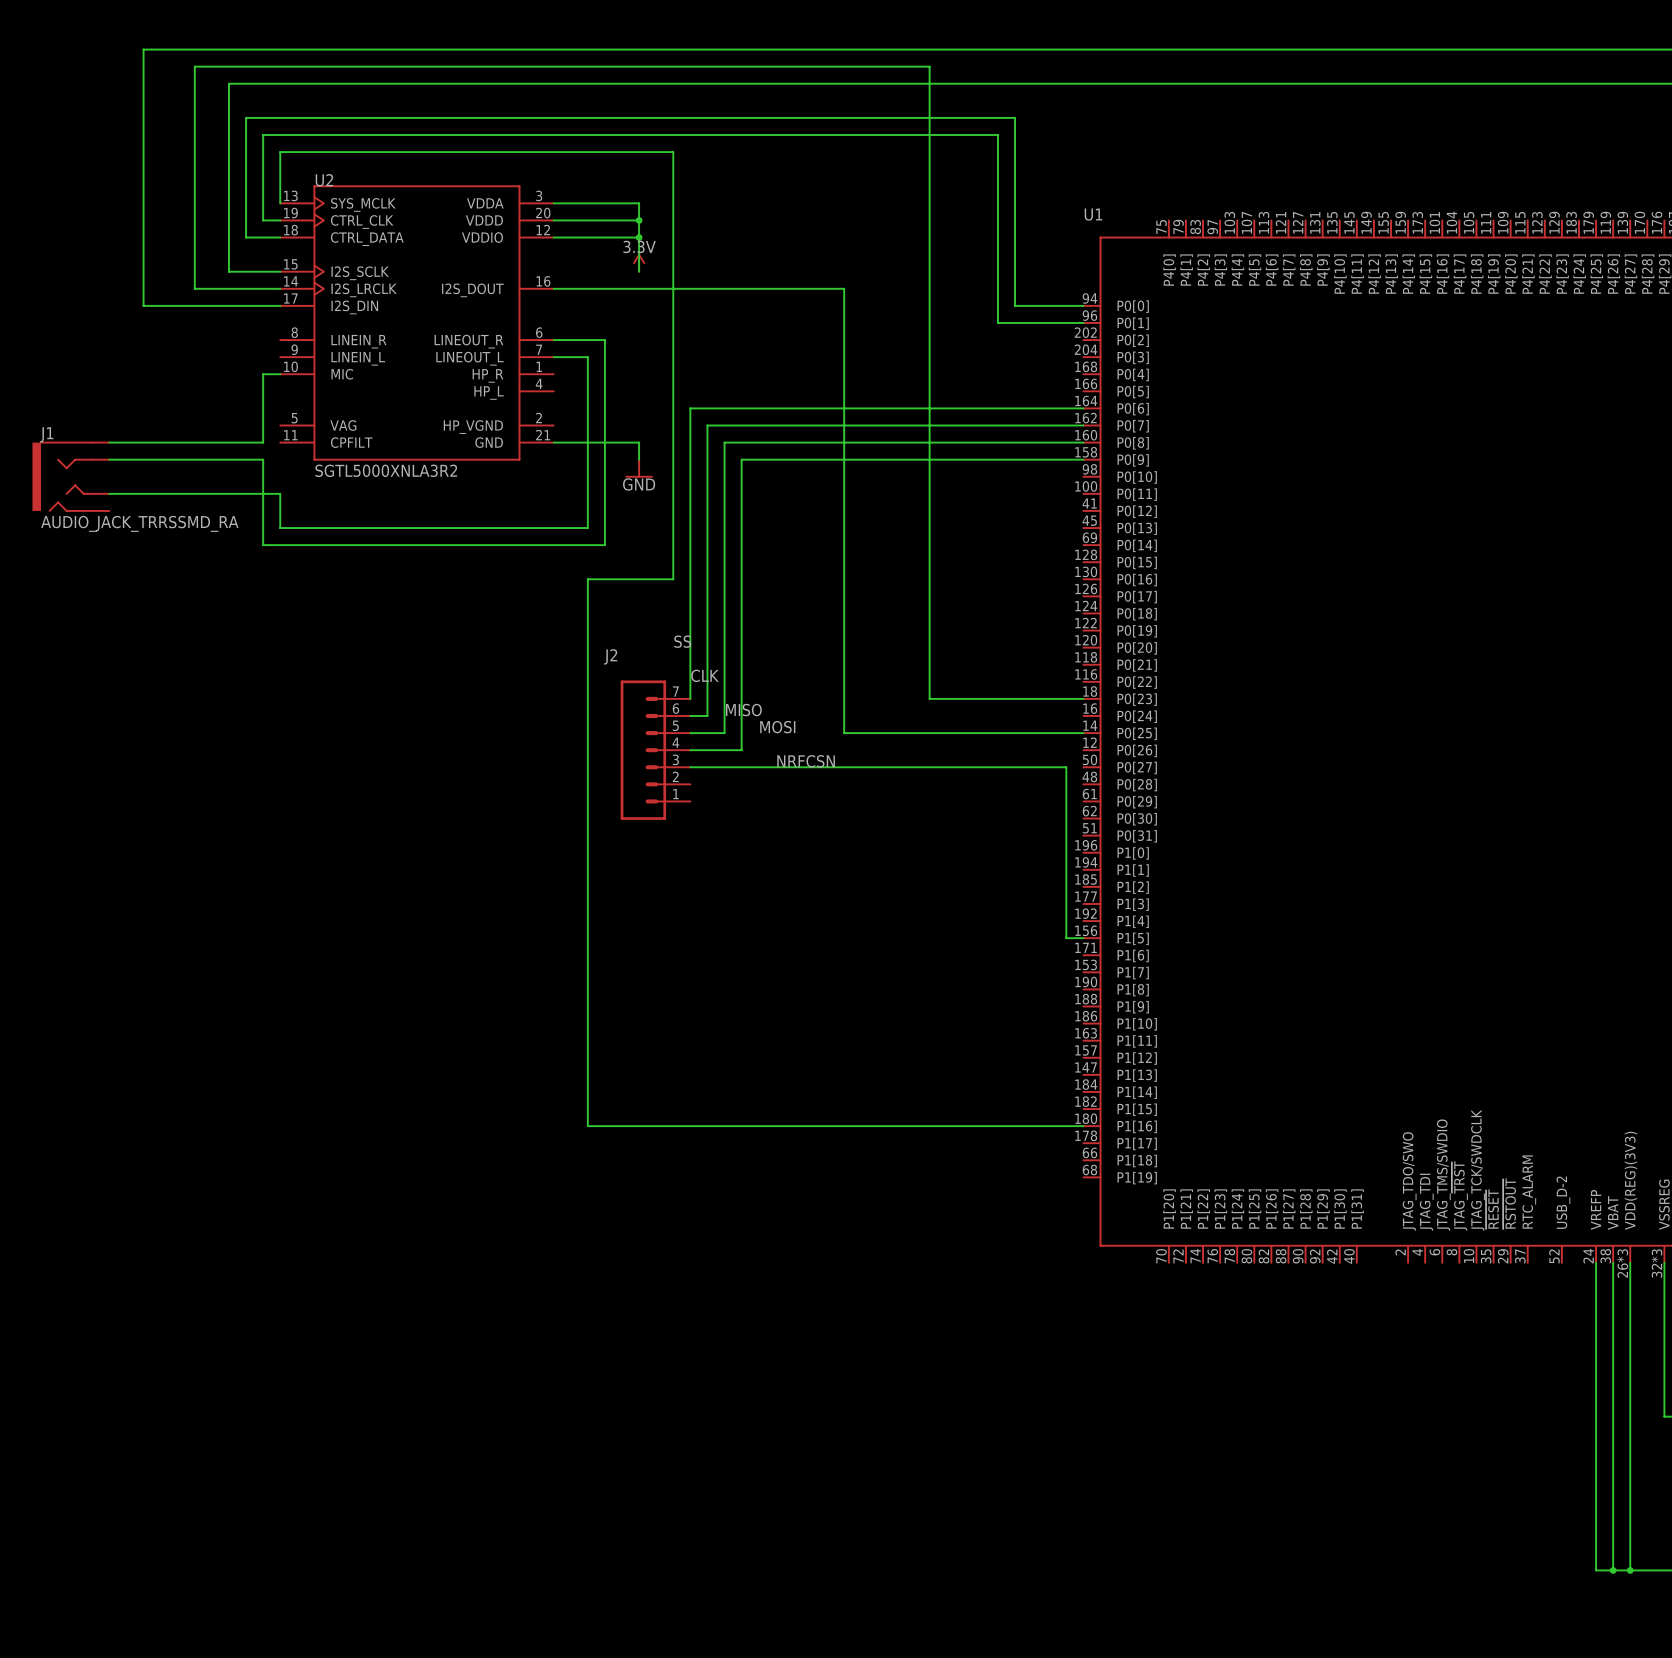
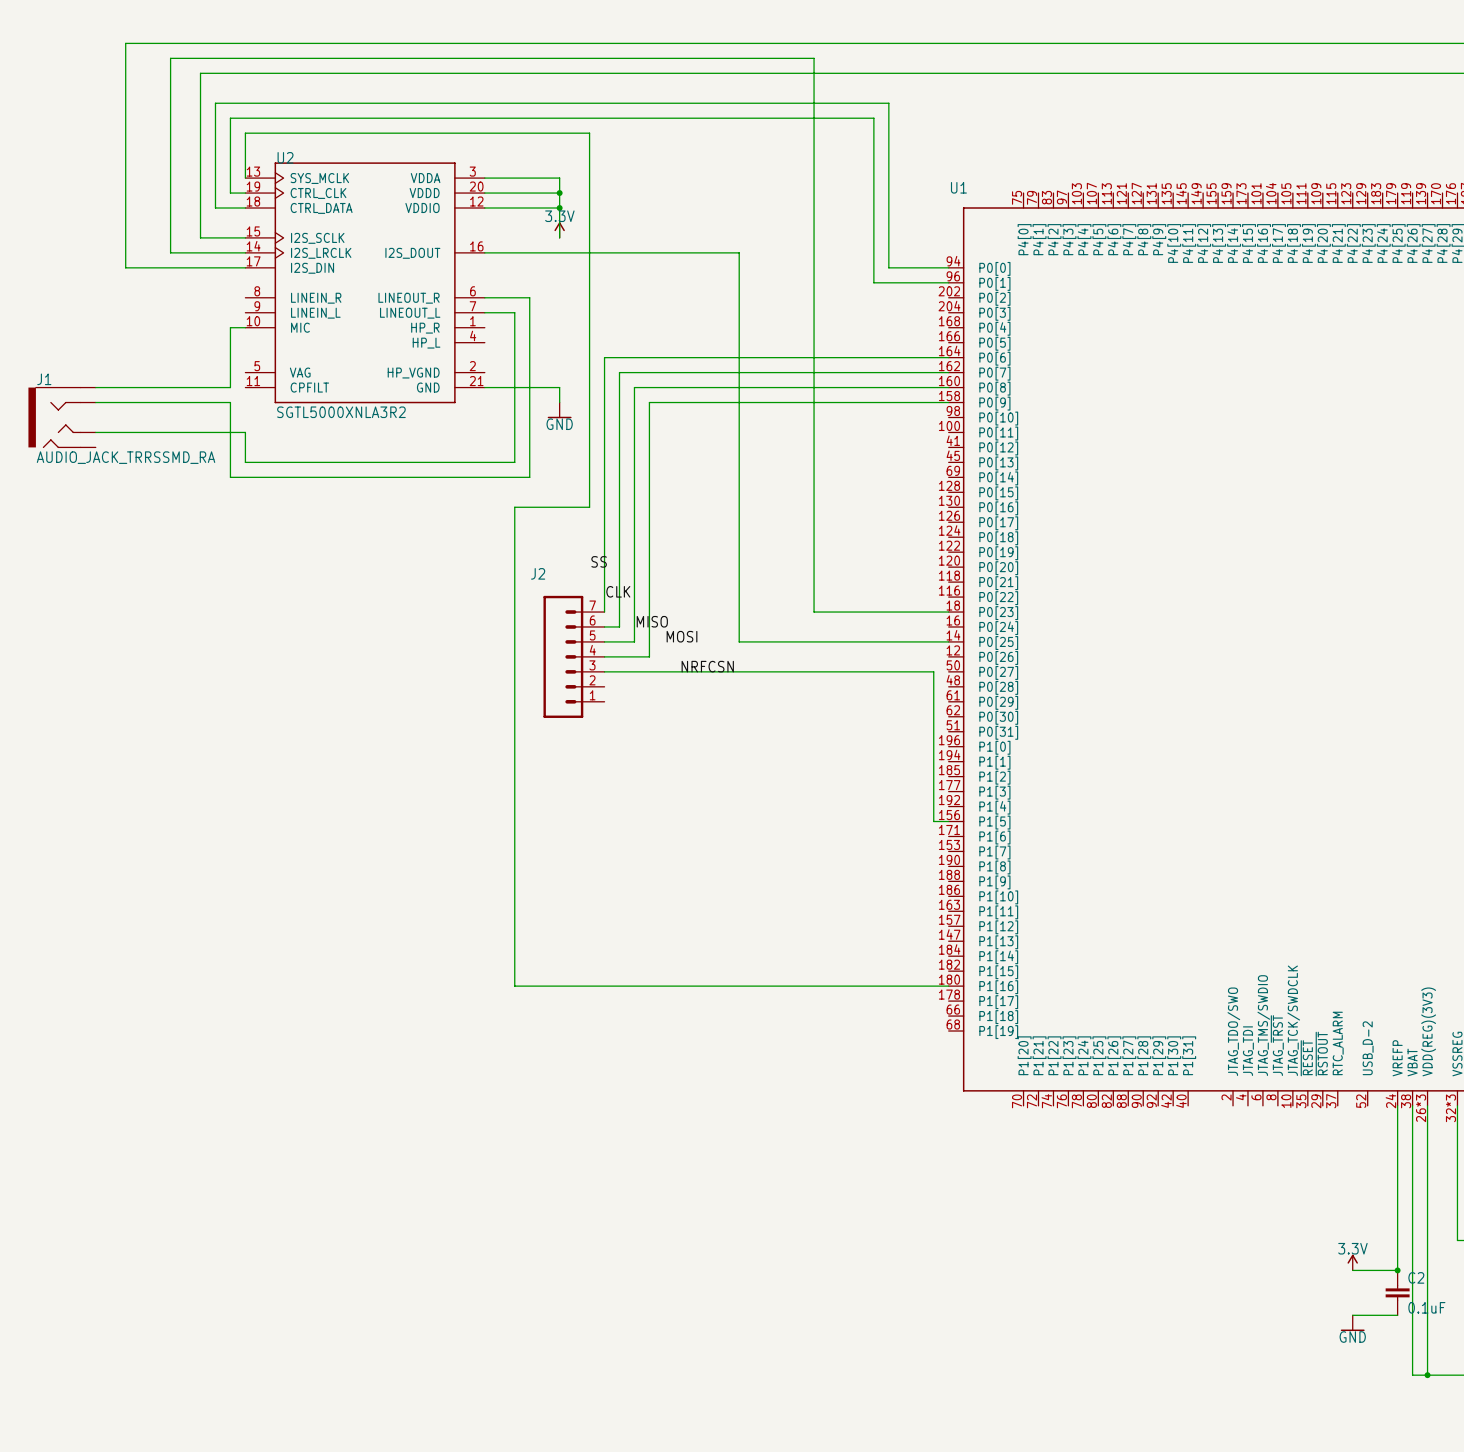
power symbol: none -> 3.3V (1352, 1262)
wire: (1596, 1450) (1596, 1570) (1613, 1570) -> (1397, 1270) (1352, 1270)
junction: none -> (1397, 1270)
C2: none -> 0.1uF (1397, 1292)
wire: none -> (1352, 1315) (1397, 1315)
power symbol: none -> GND (1352, 1323)
junction: (1613, 1570) -> none

